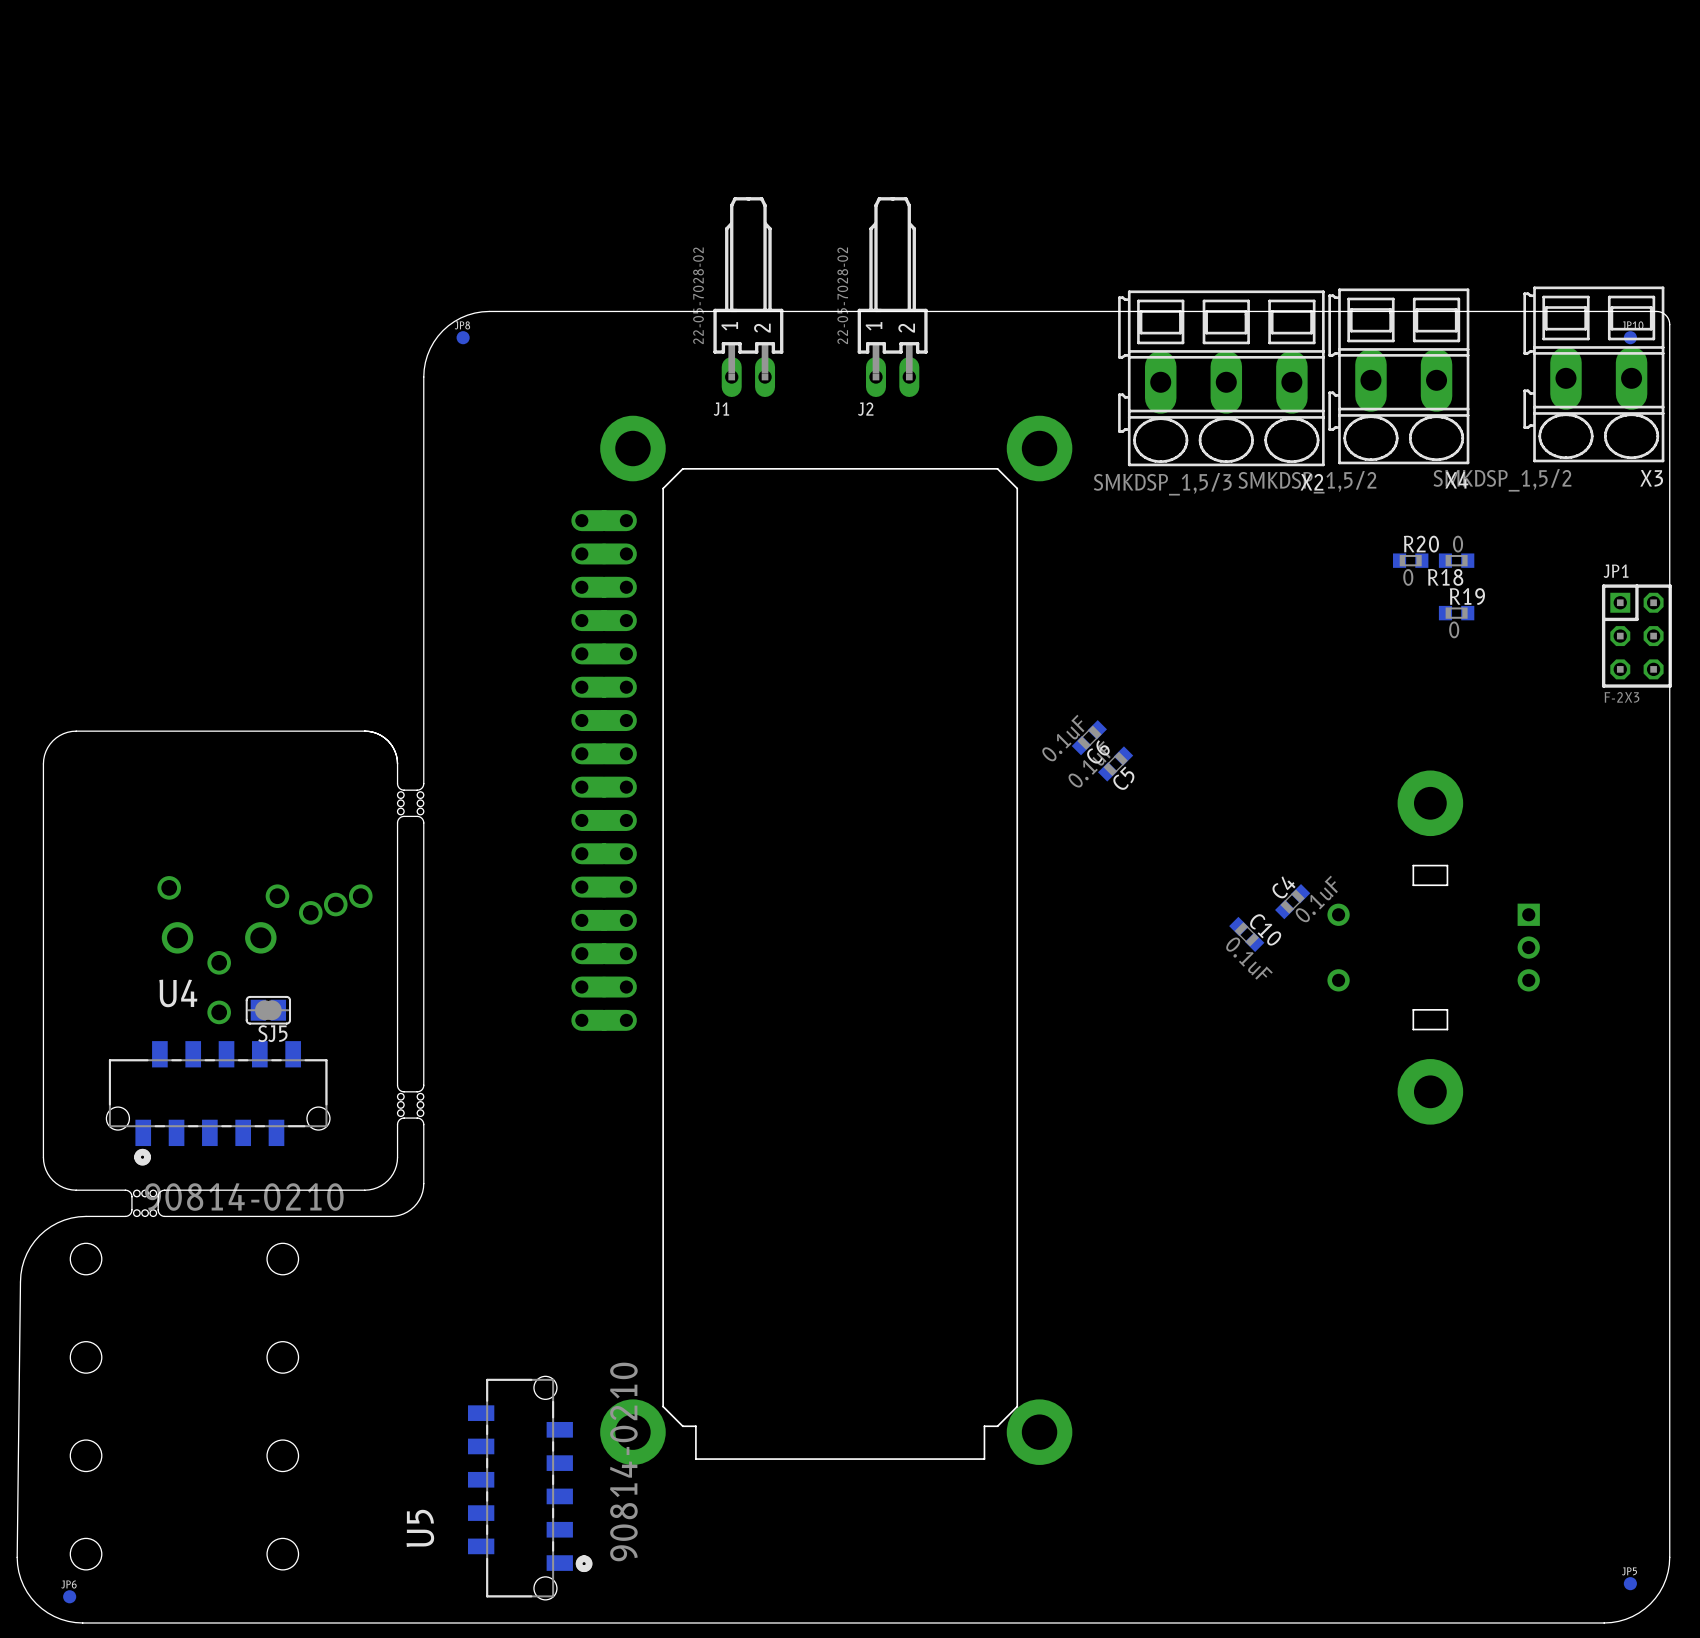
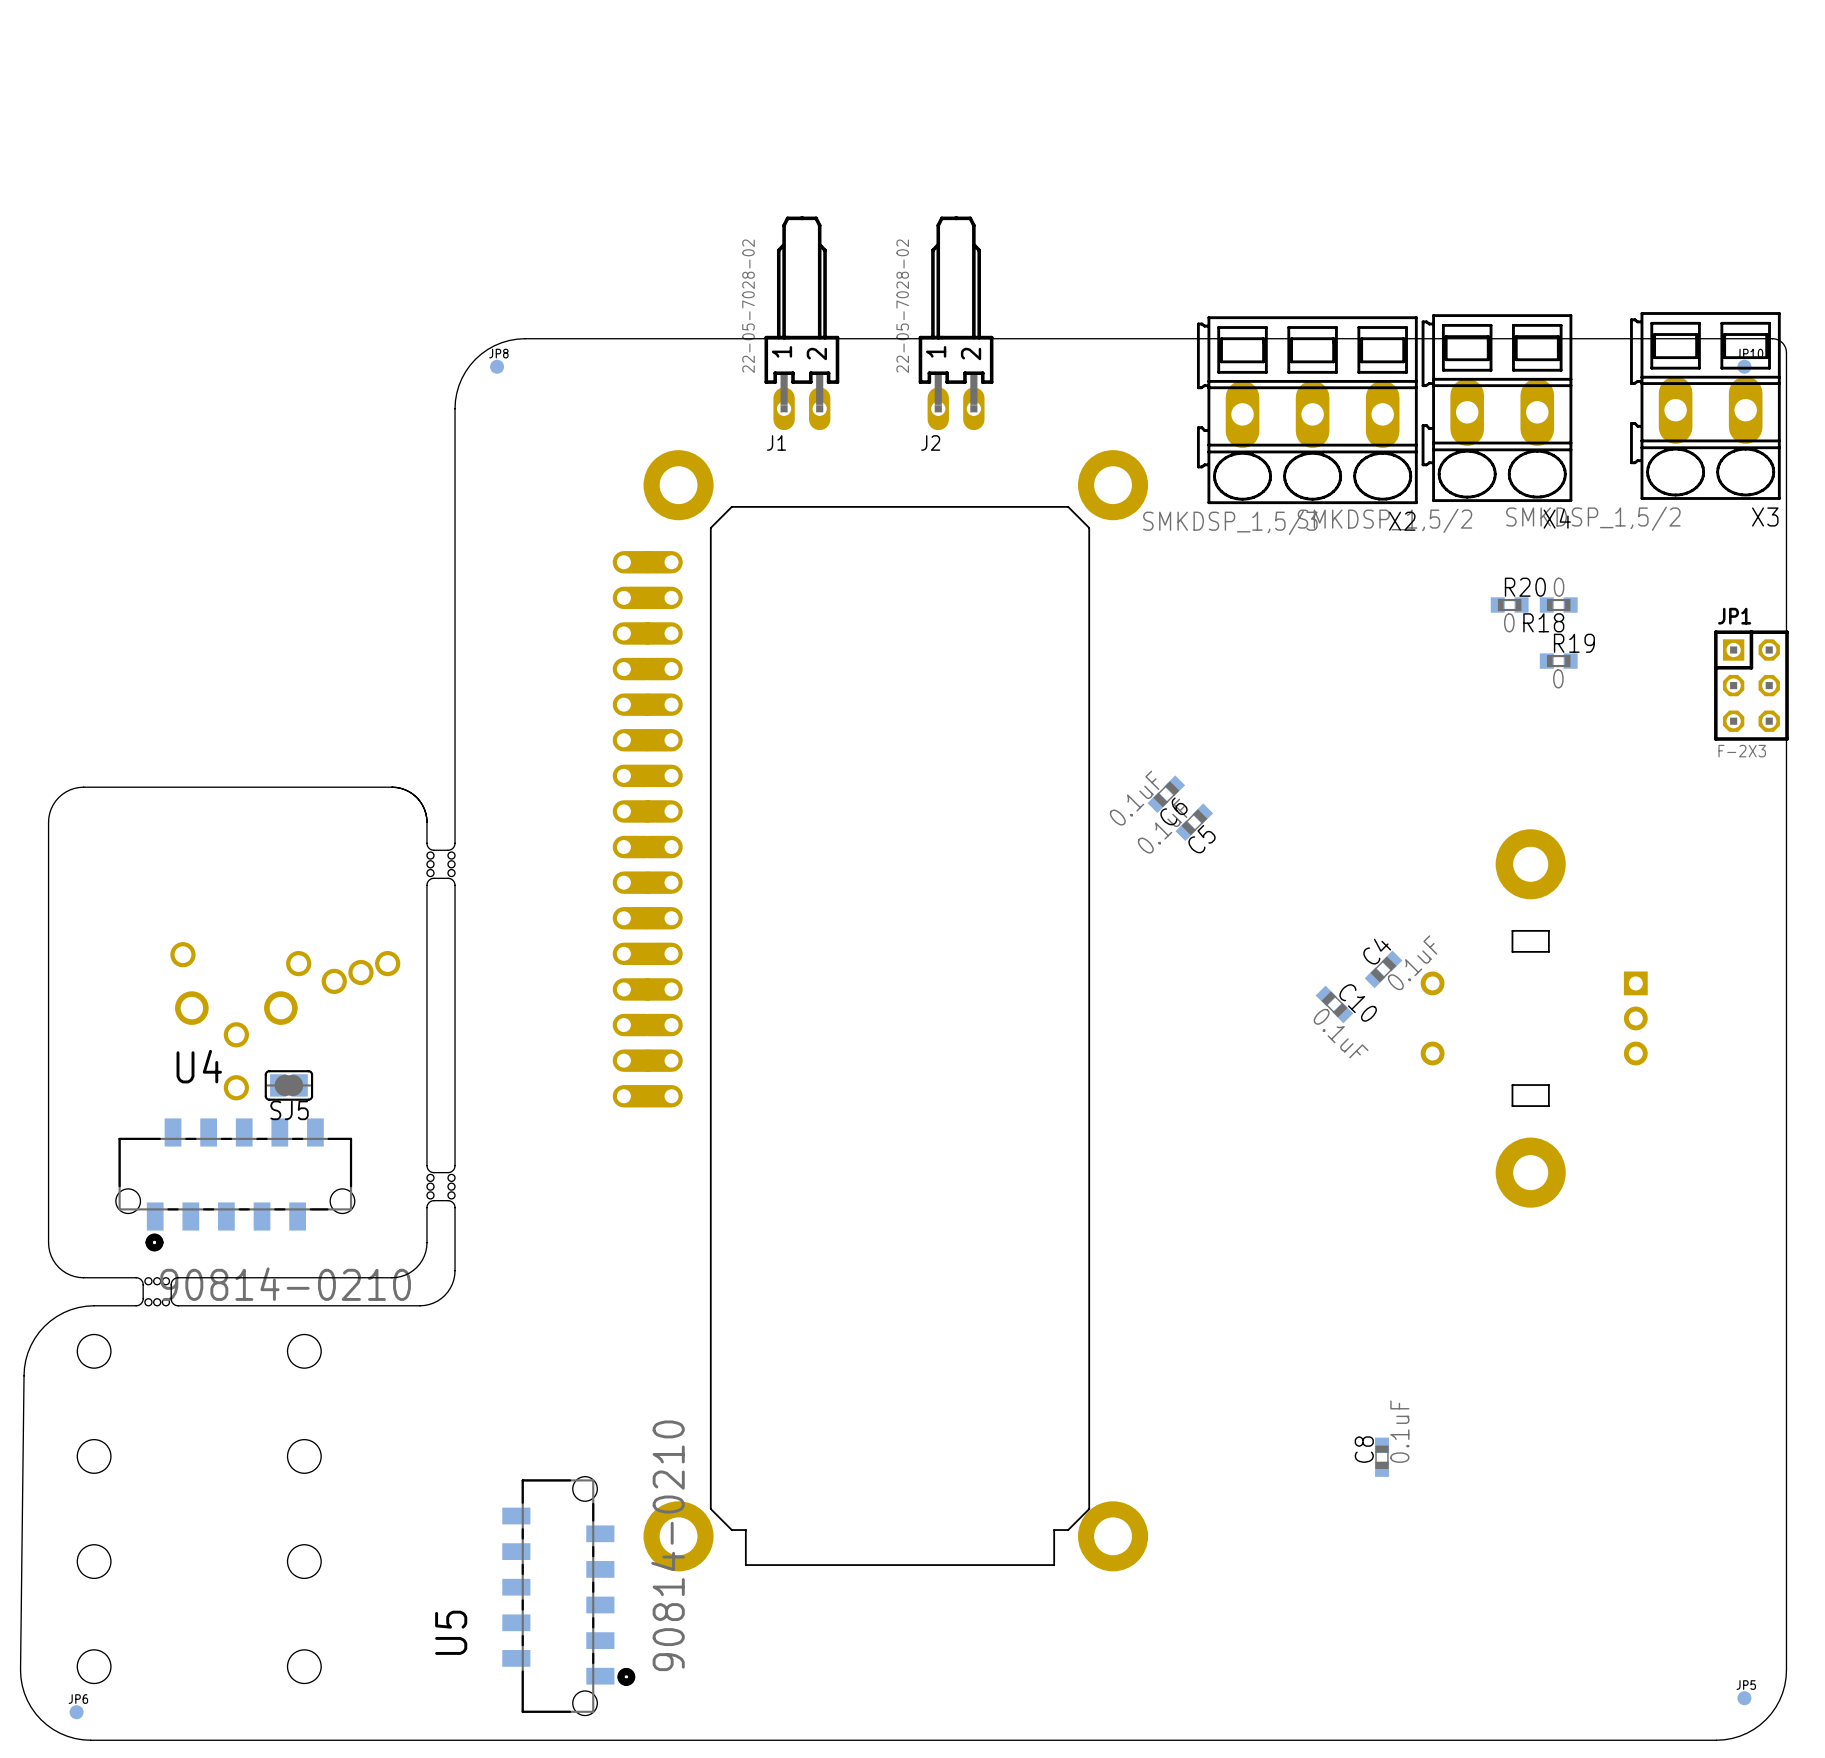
C8: none -> 0.1uF (1382, 1457)

